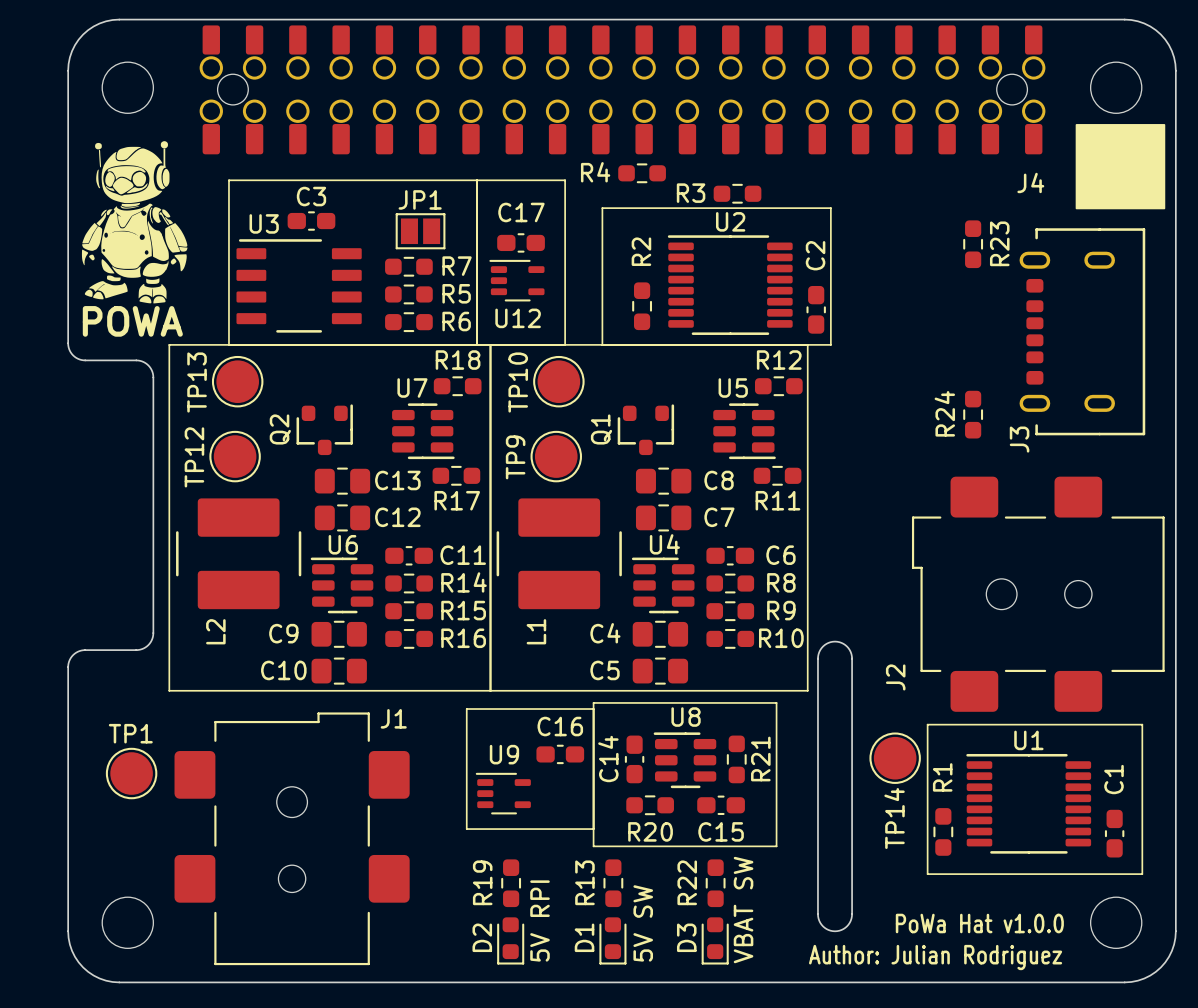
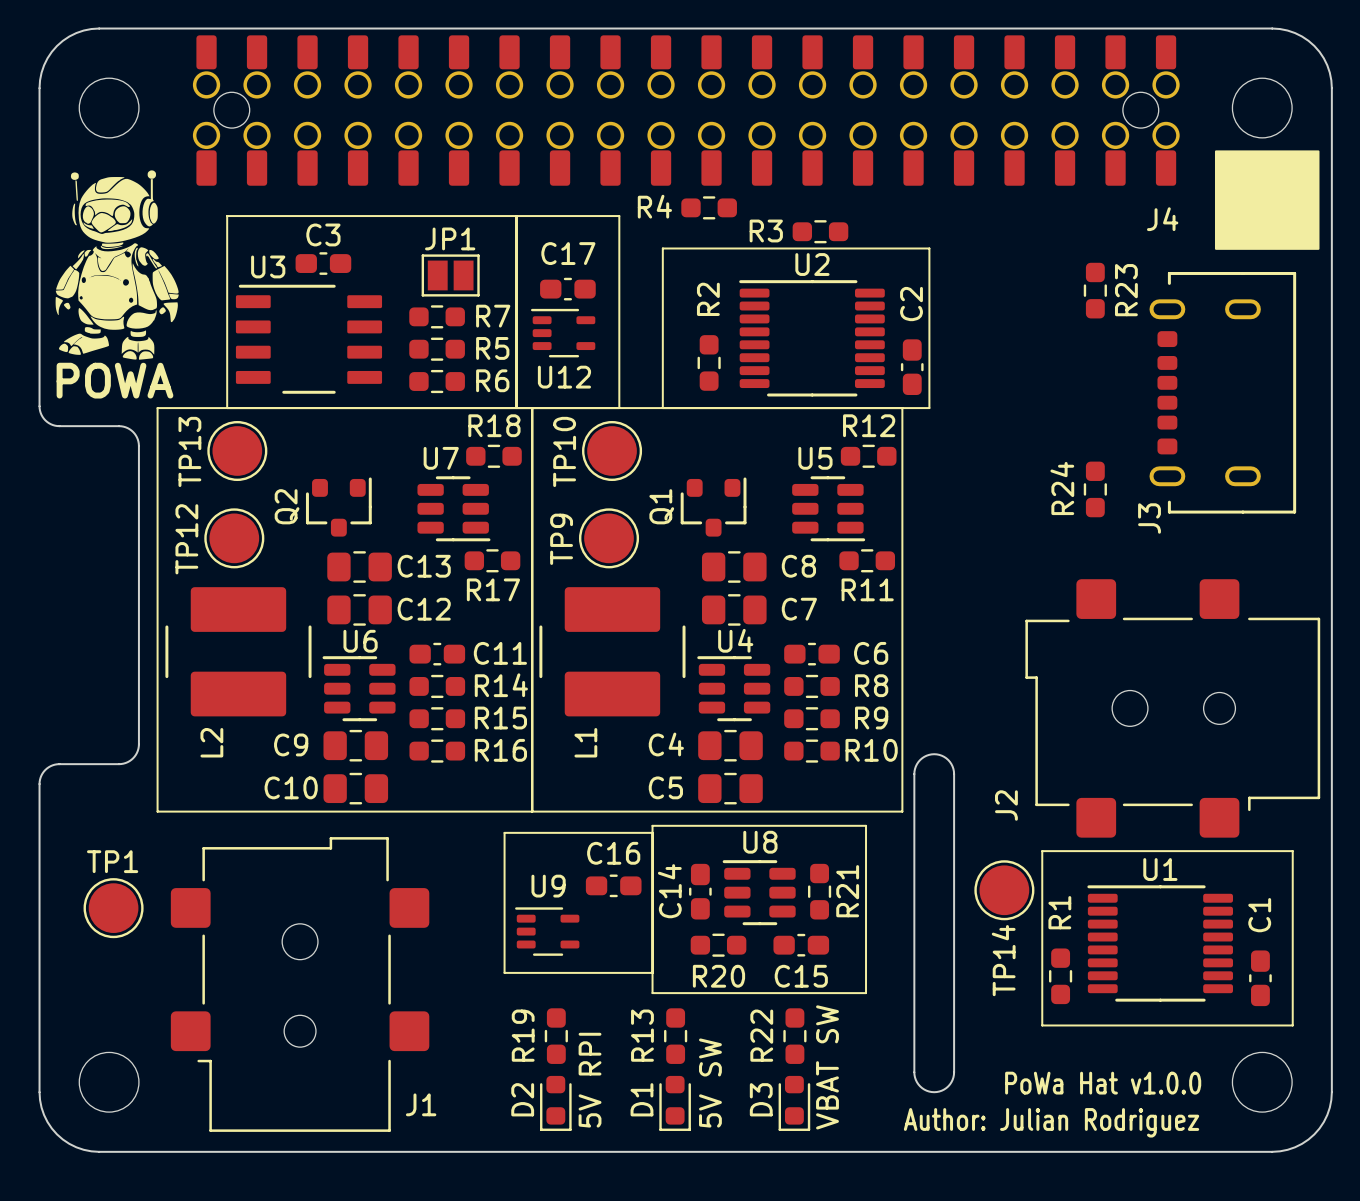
J2 footprint: [911, 476, 1165, 712] -> [1025, 579, 1321, 838]
J1 footprint: [174, 712, 410, 966] -> [170, 837, 430, 1132]
J1 name position: J1 (393, 718) -> J1 (421, 1104)

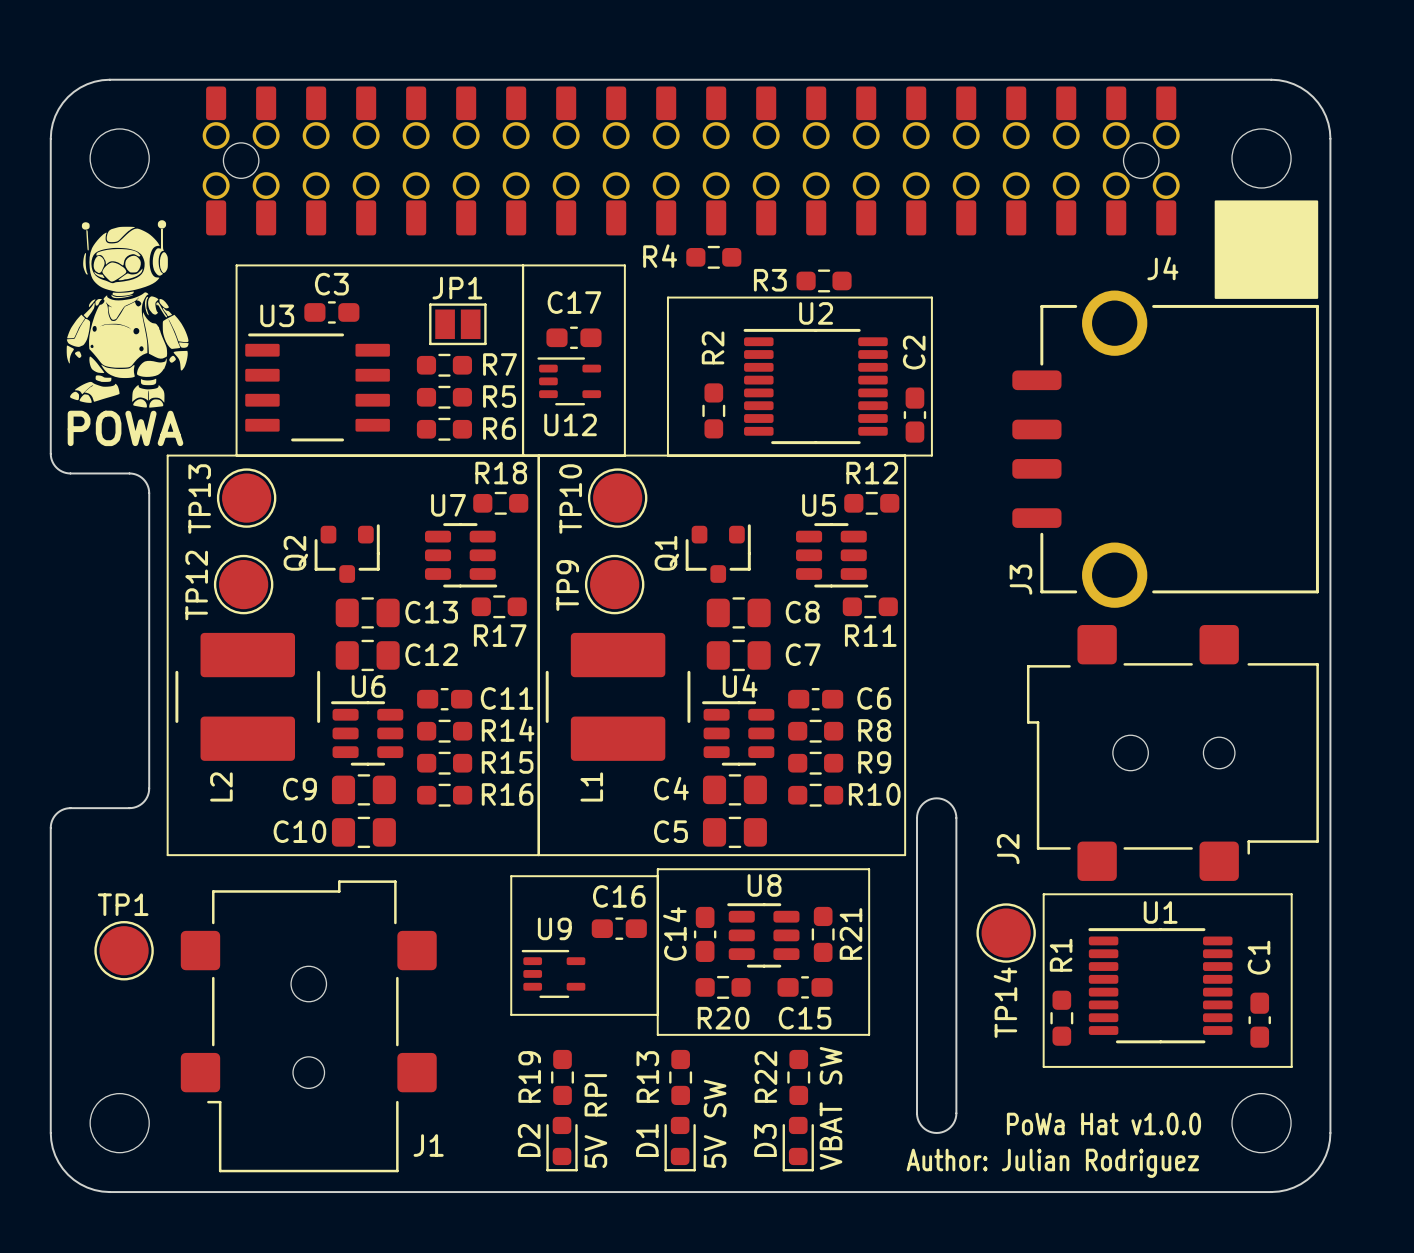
J3 footprint: [1149, 271, 1297, 514] -> [1012, 290, 1319, 608]
R23: (1095, 290) -> none
R24: (1095, 489) -> none
J3 name position: J3 (1149, 518) -> J3 (1020, 579)

